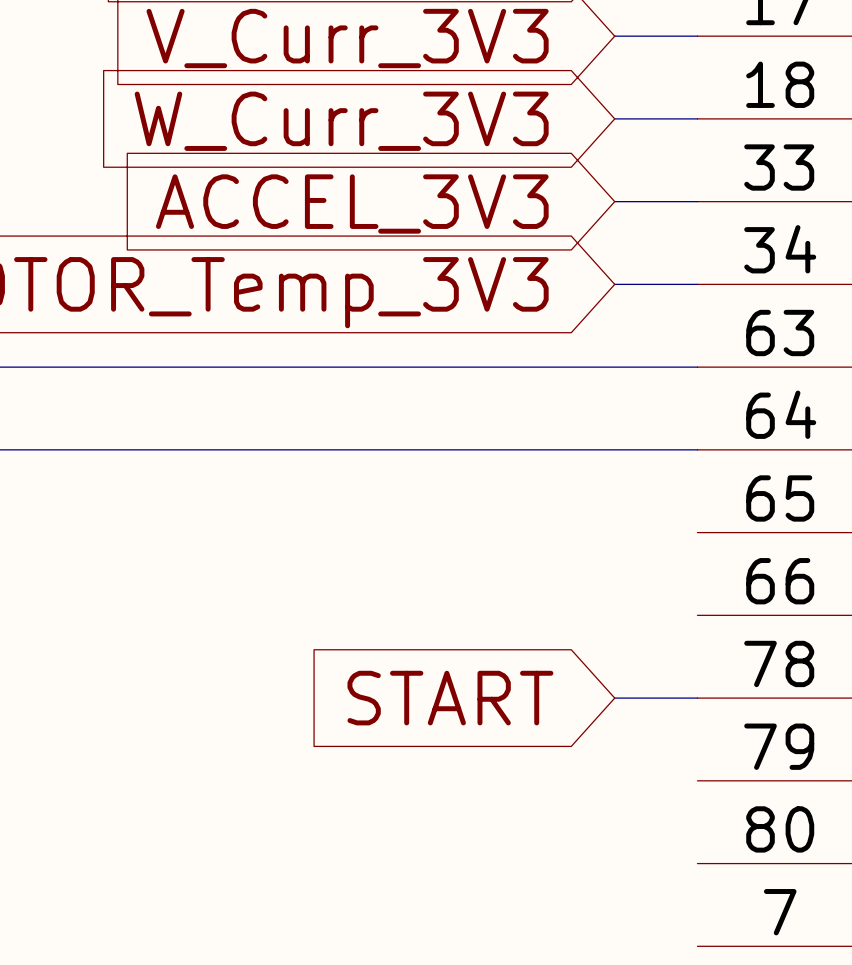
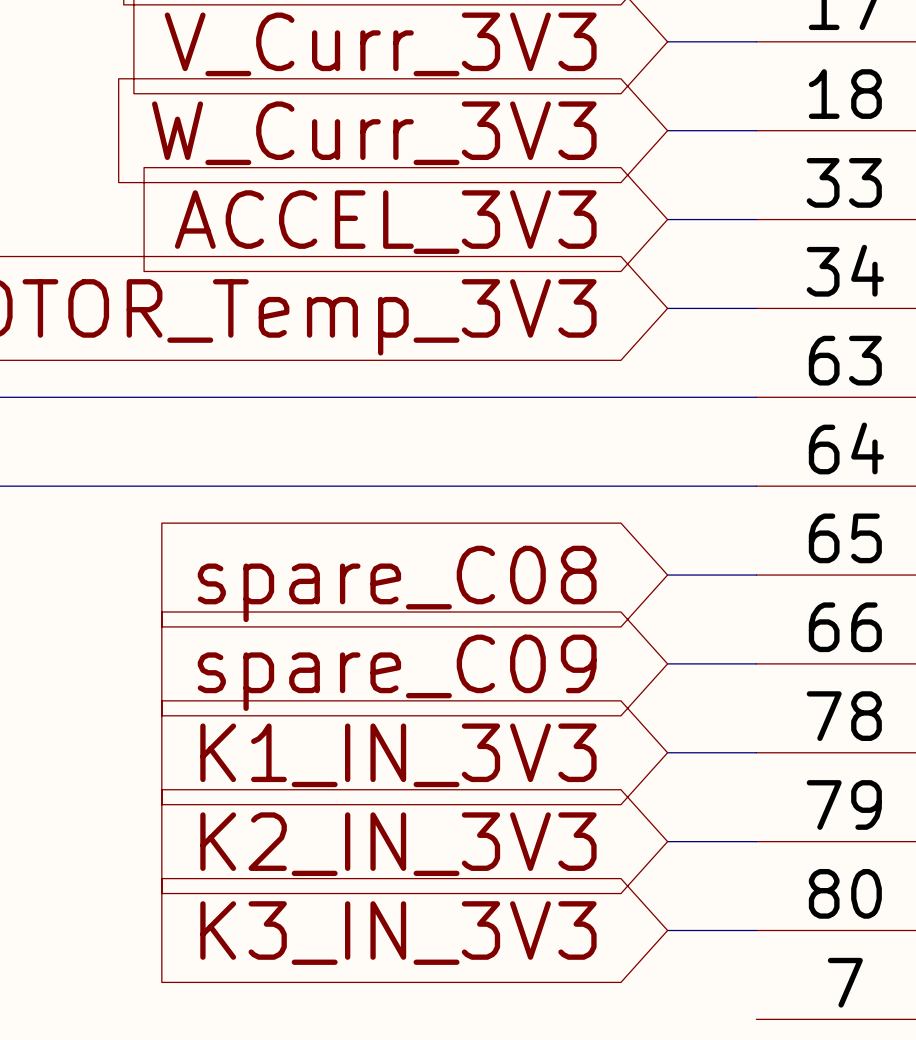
wire: none -> (667, 575) (756, 575)
global label: none -> spare_C08 (397, 583)
wire: none -> (667, 663) (756, 663)
global label: none -> spare_C09 (397, 672)
global label: START (450, 698) -> K1_IN_3V3 (398, 755)
wire: none -> (667, 841) (756, 841)
global label: none -> K2_IN_3V3 (398, 844)
wire: none -> (667, 930) (756, 930)
global label: none -> K3_IN_3V3 (398, 933)

